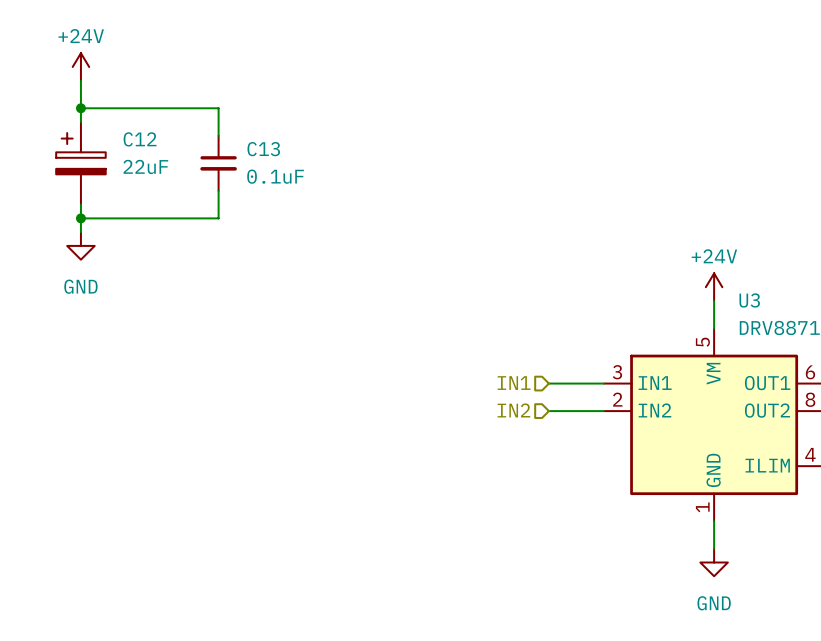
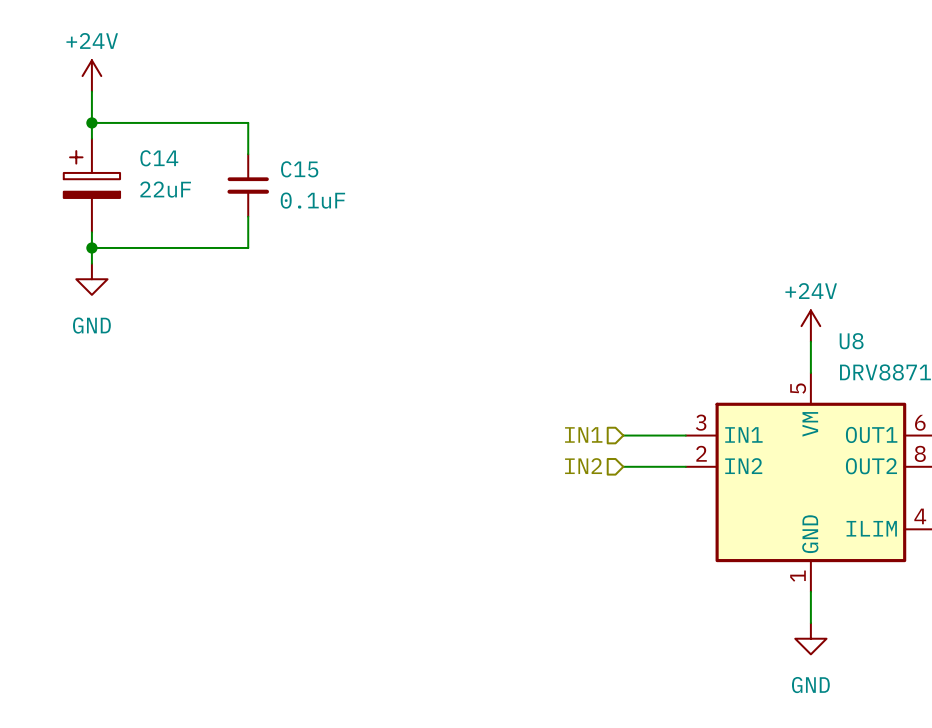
C12 name: C12 (140, 139) -> C14 (159, 158)
C13 name: C13 (263, 149) -> C15 (299, 169)
U3 name: U3 (749, 300) -> U8 (851, 341)

